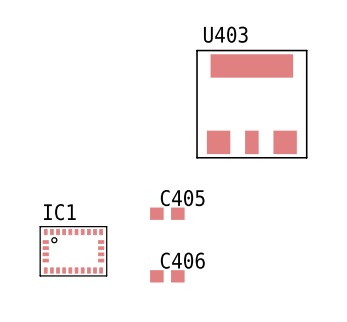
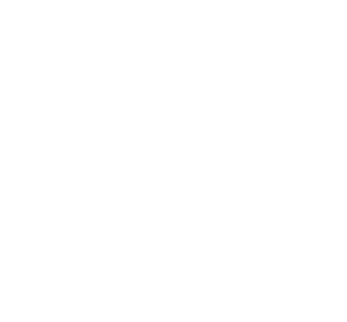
U403: (251, 104) -> none
C405: (167, 213) -> none
IC1: (73, 251) -> none
C406: (167, 276) -> none

